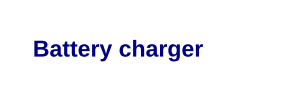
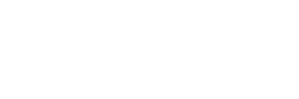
text: Battery charger (118, 50) -> none

